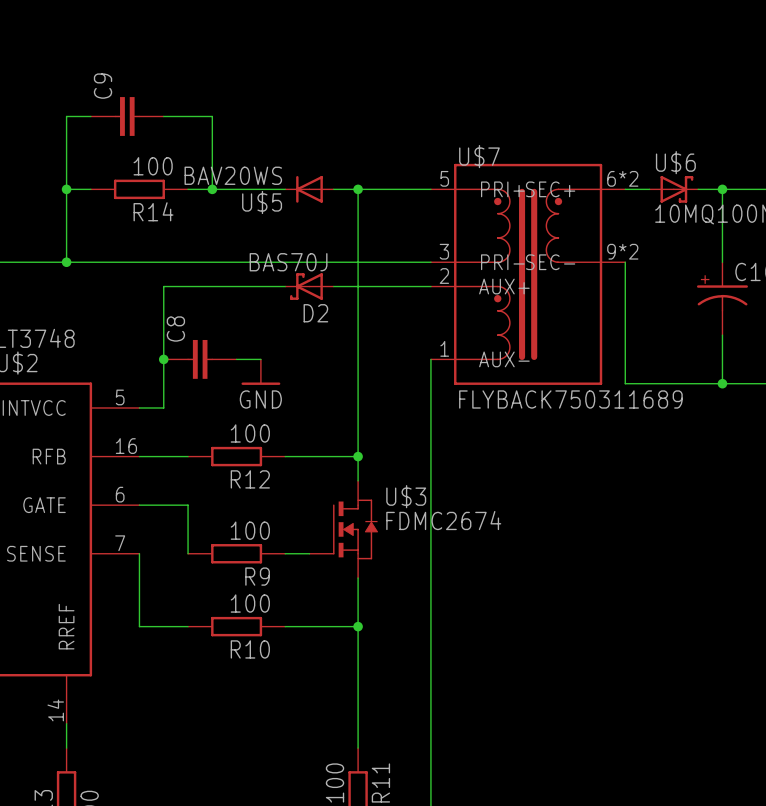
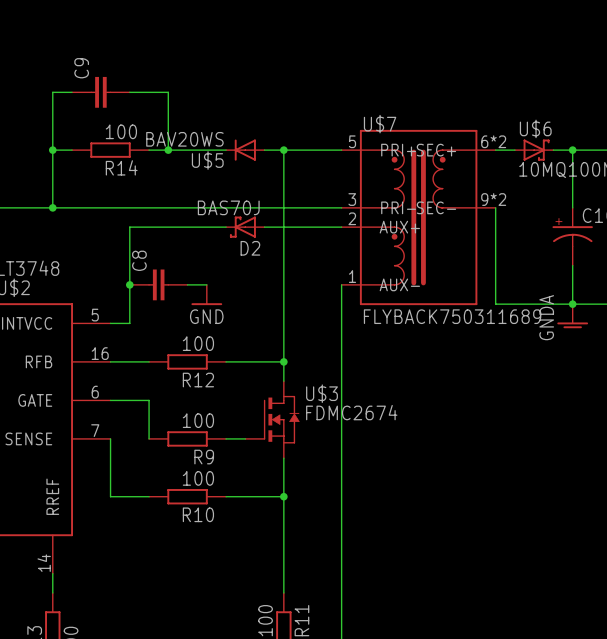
power symbol: none -> GNDA (572, 316)

